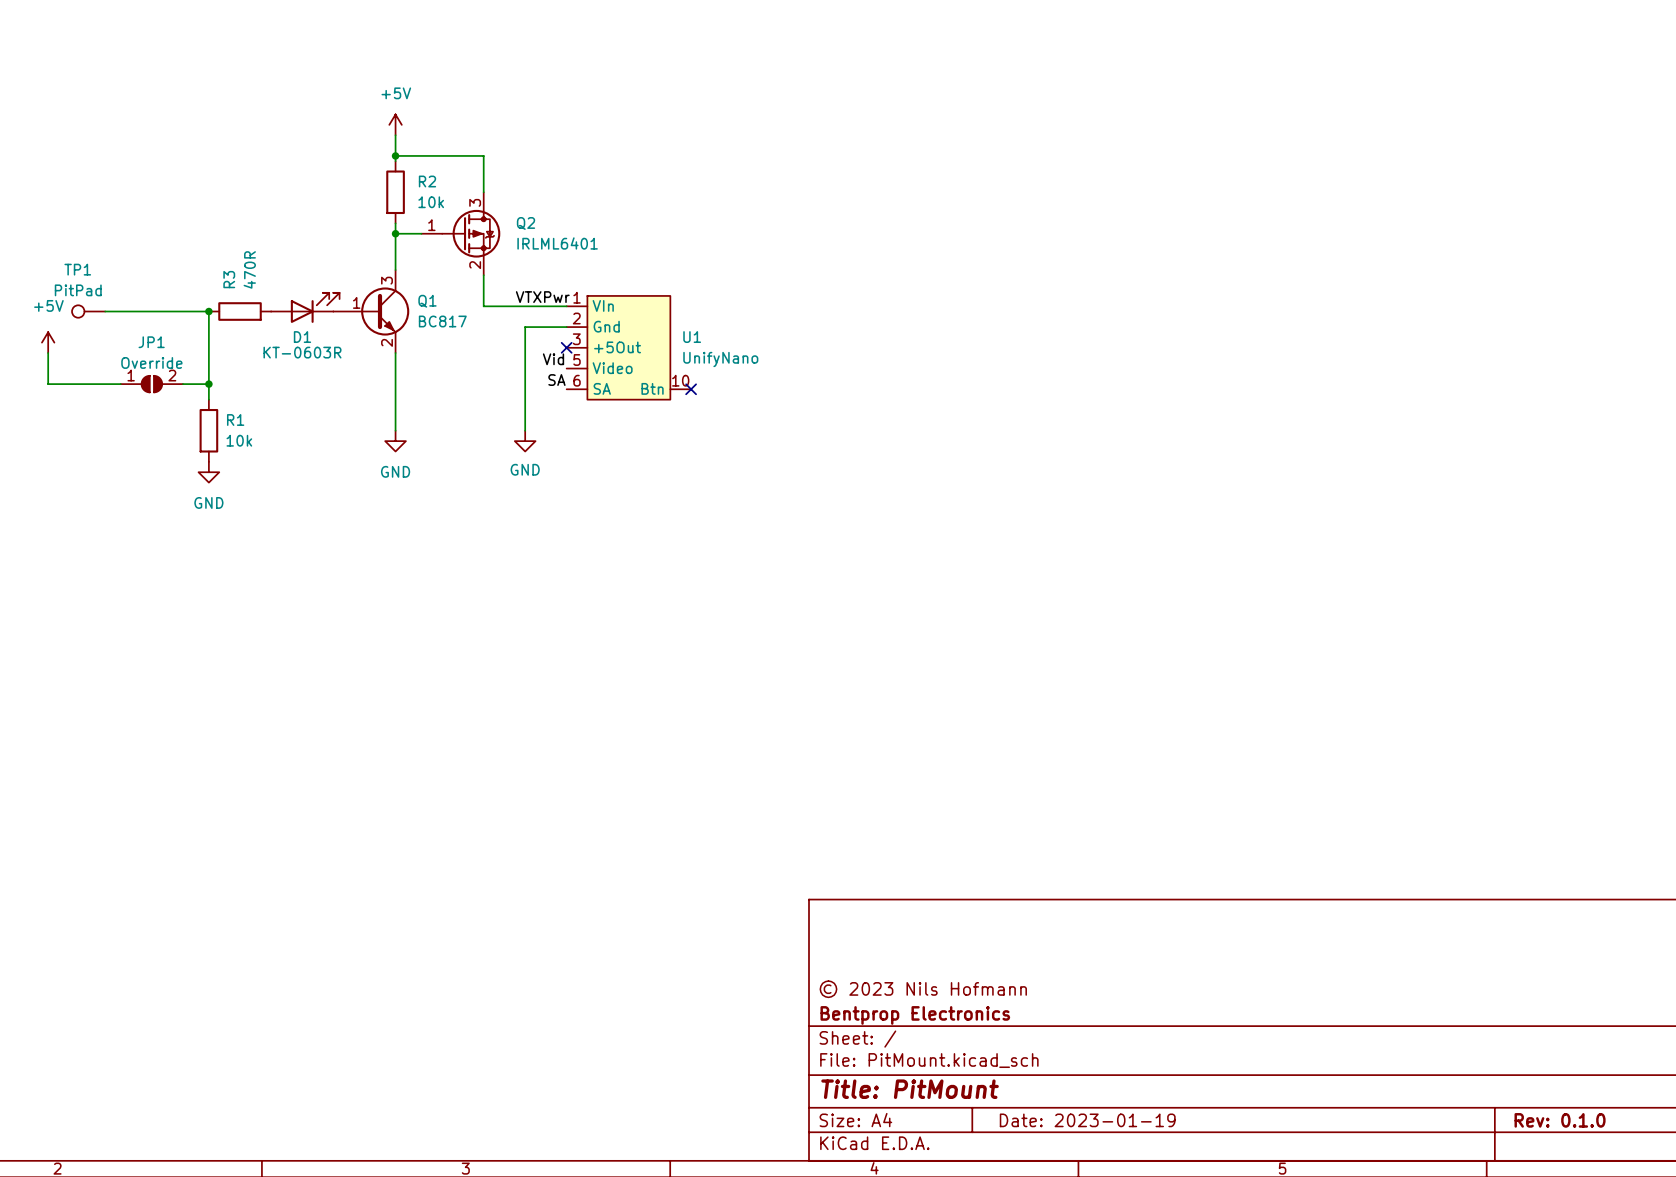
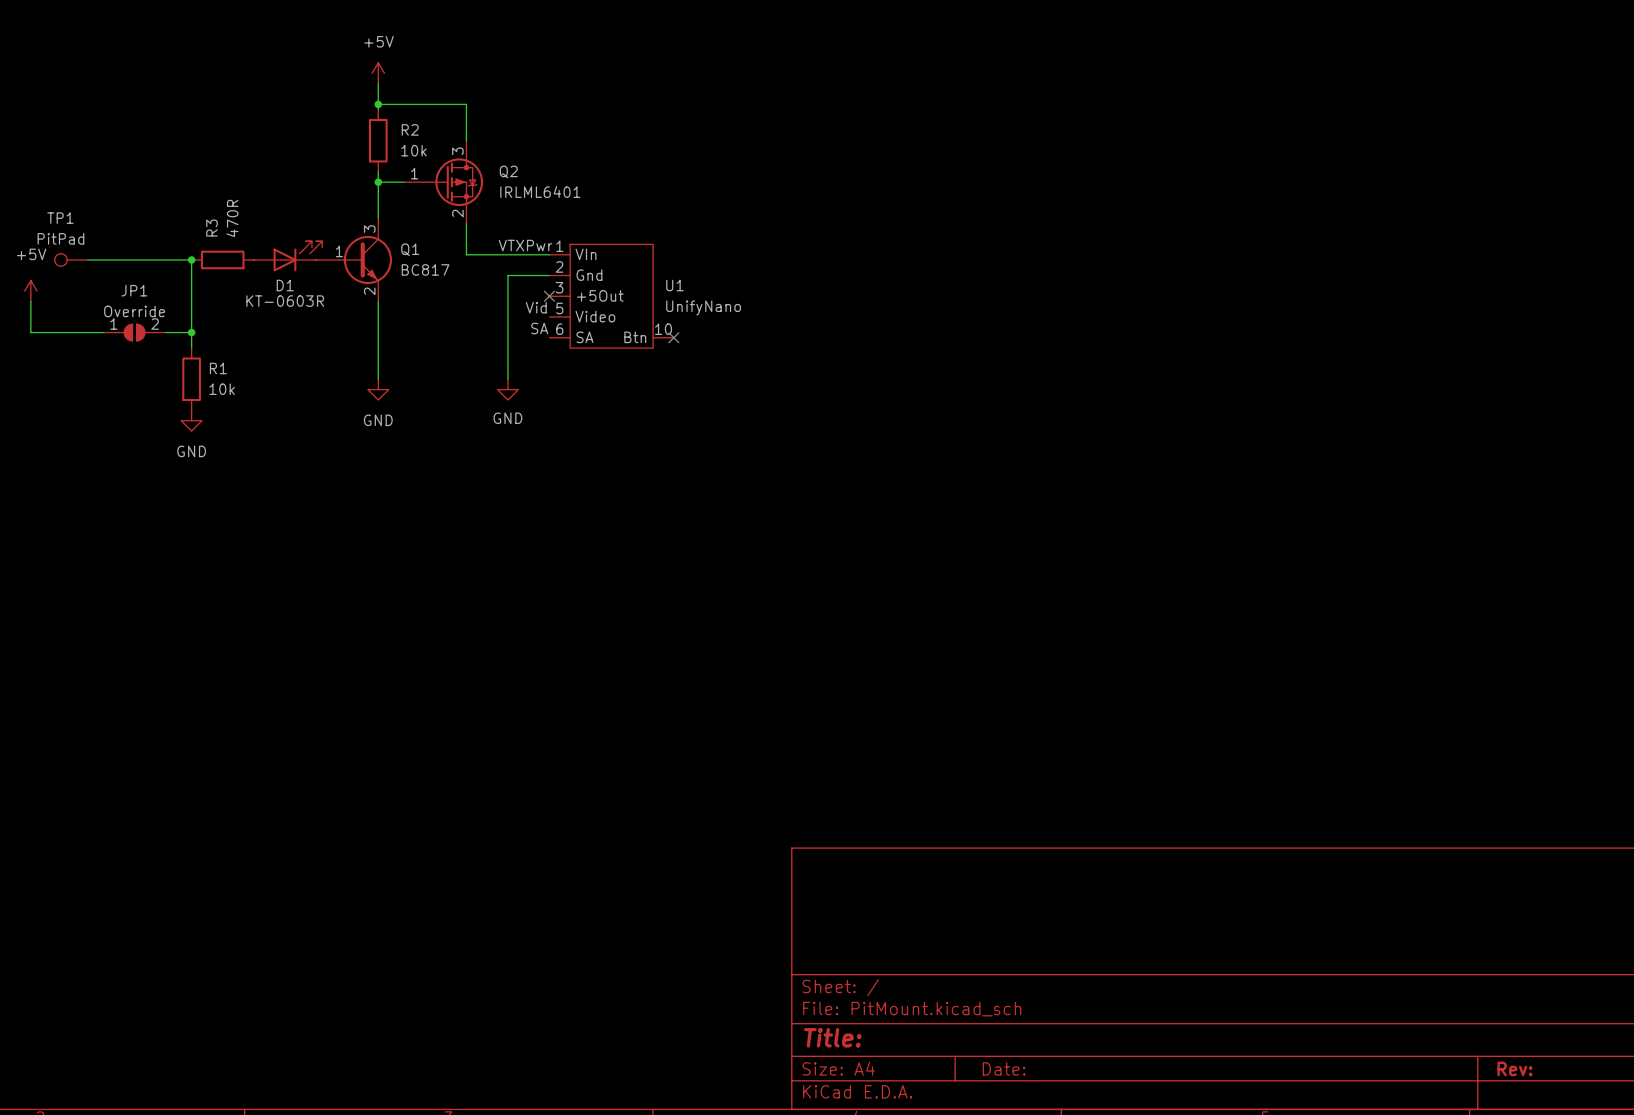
title block: © 2023 Nils Hofmann (923, 989) -> none
title block: Bentprop Electronics (915, 1015) -> none
title block: Title: PitMount (910, 1089) -> Title: (832, 1037)
title block: Date: 2023-01-19 (1087, 1120) -> Date: (1004, 1068)
title block: Rev: 0.1.0 (1560, 1120) -> Rev: (1514, 1068)

